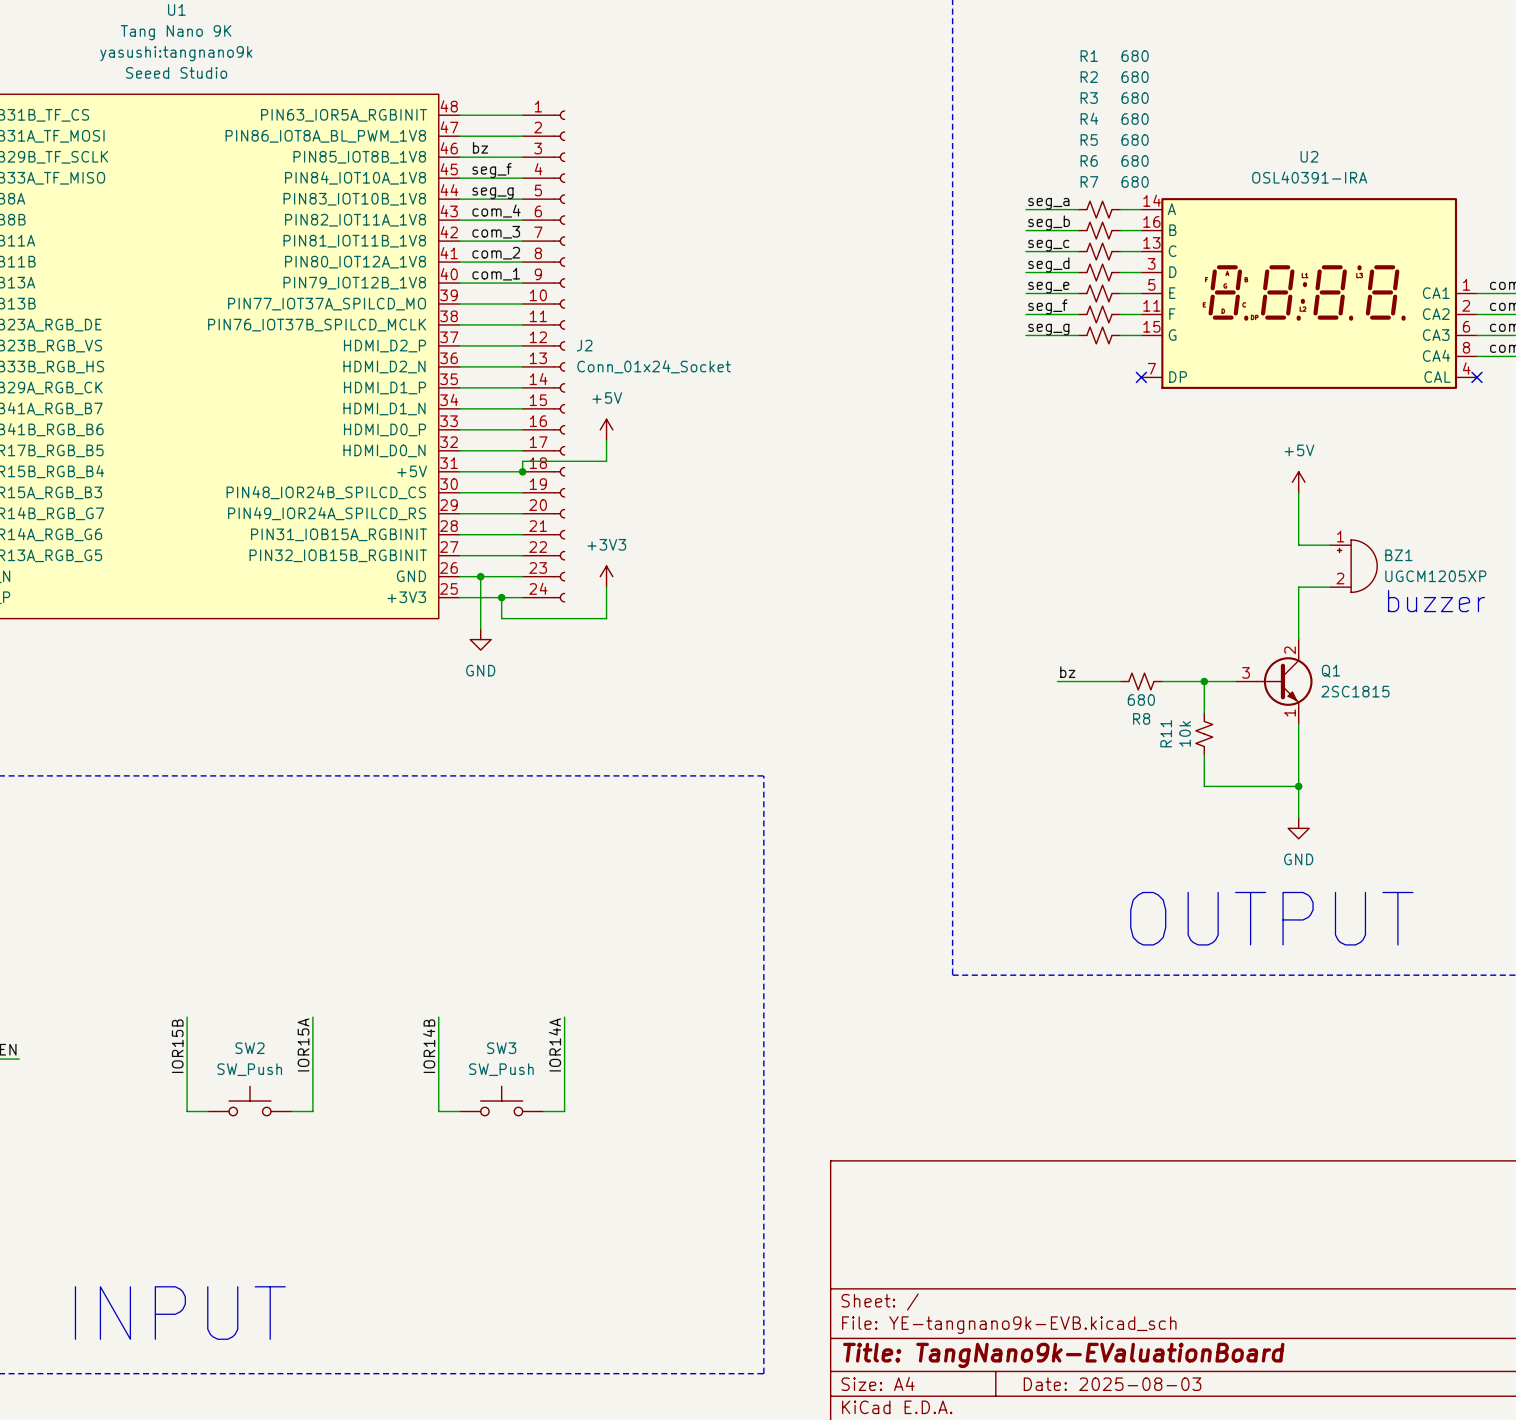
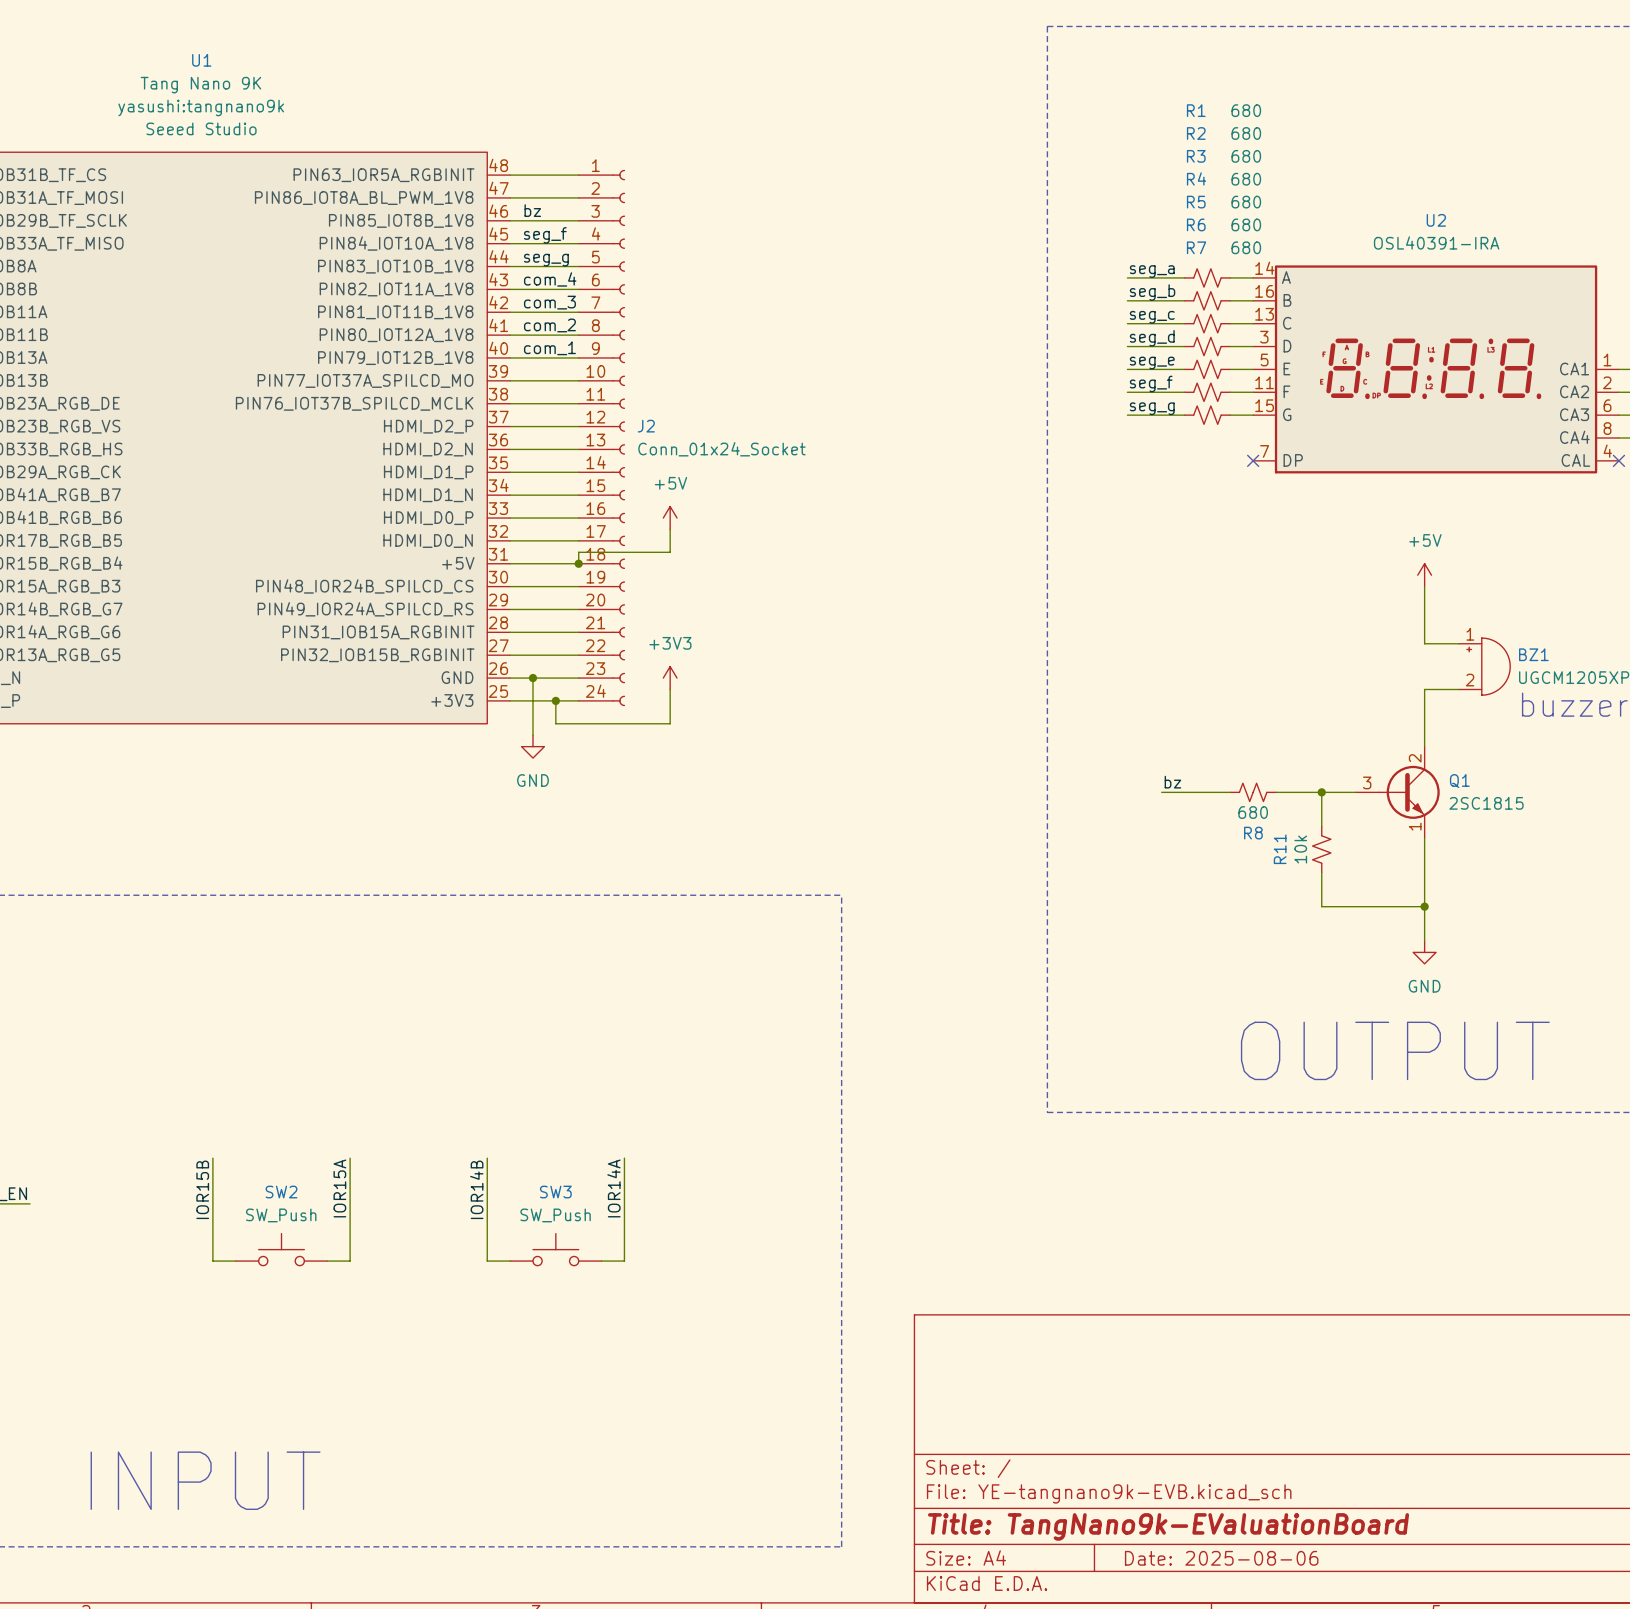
title block: Date: 2025-08-03 (1112, 1384) -> Date: 2025-08-06 (1221, 1558)

